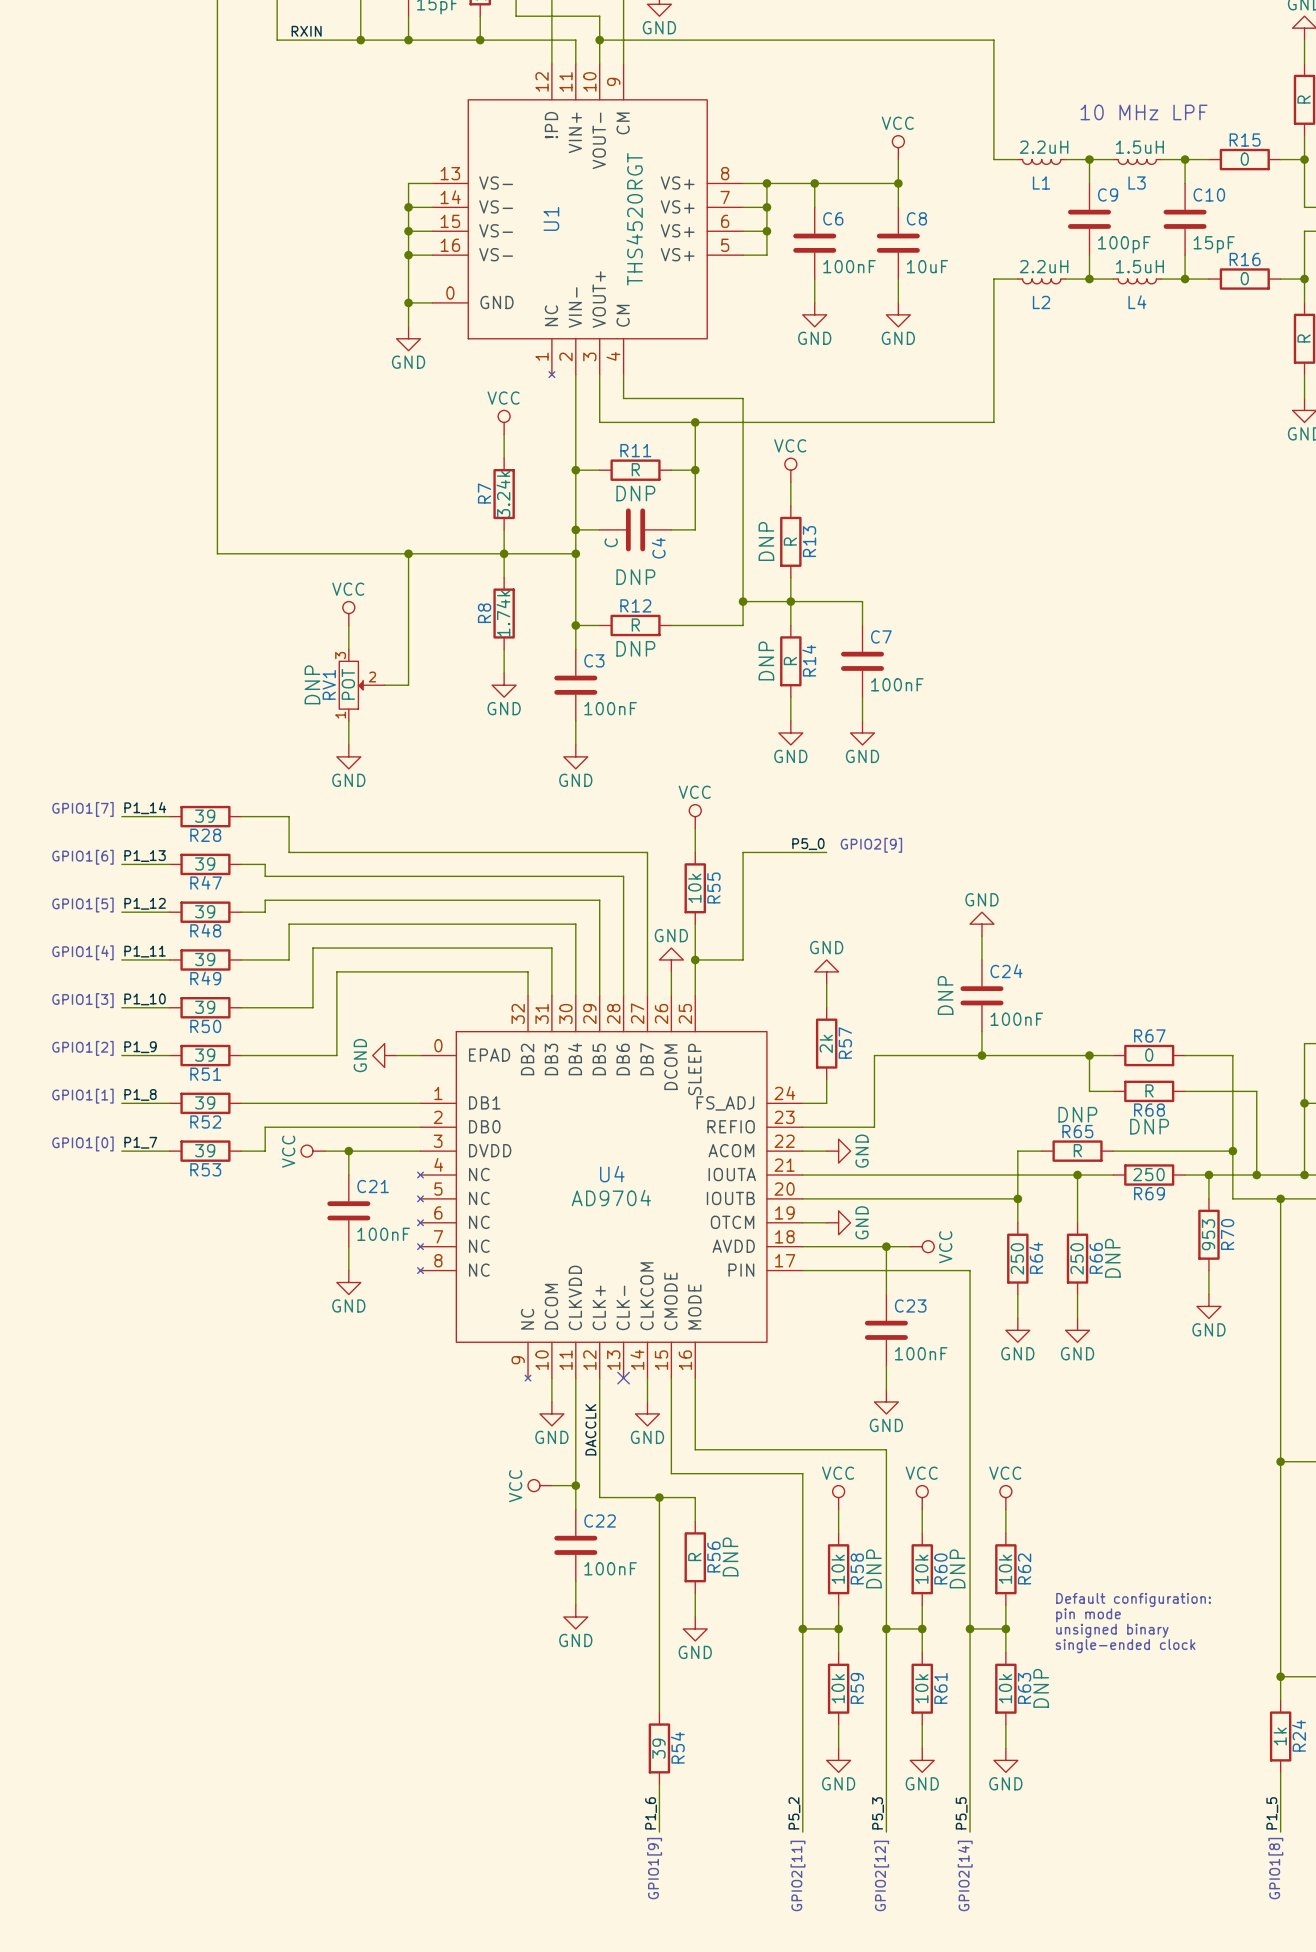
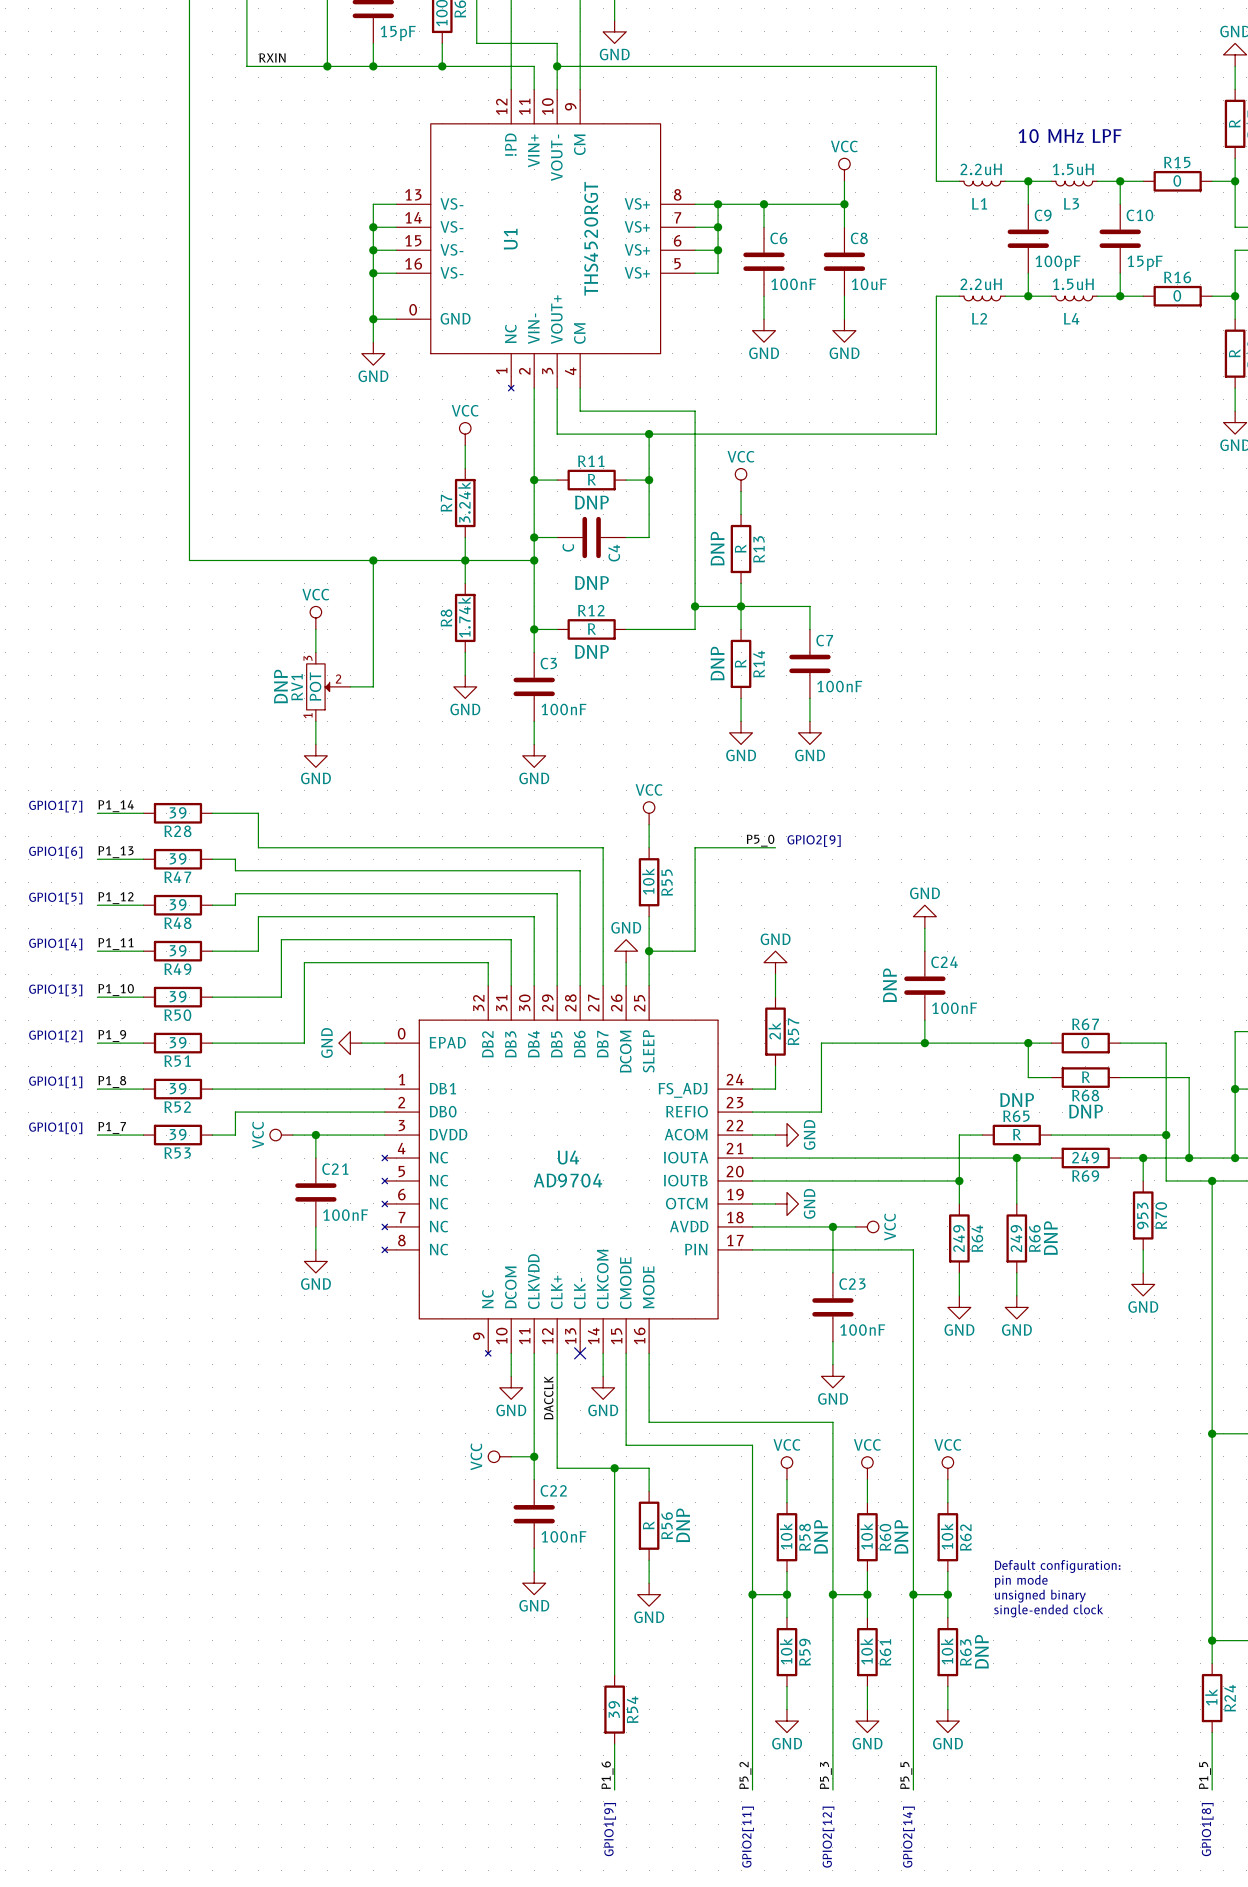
R69 value: 250 (1148, 1174) -> 249 (1085, 1157)
R64 value: 250 (1017, 1258) -> 249 (958, 1238)
R66 value: 250 (1077, 1258) -> 249 (1016, 1238)

